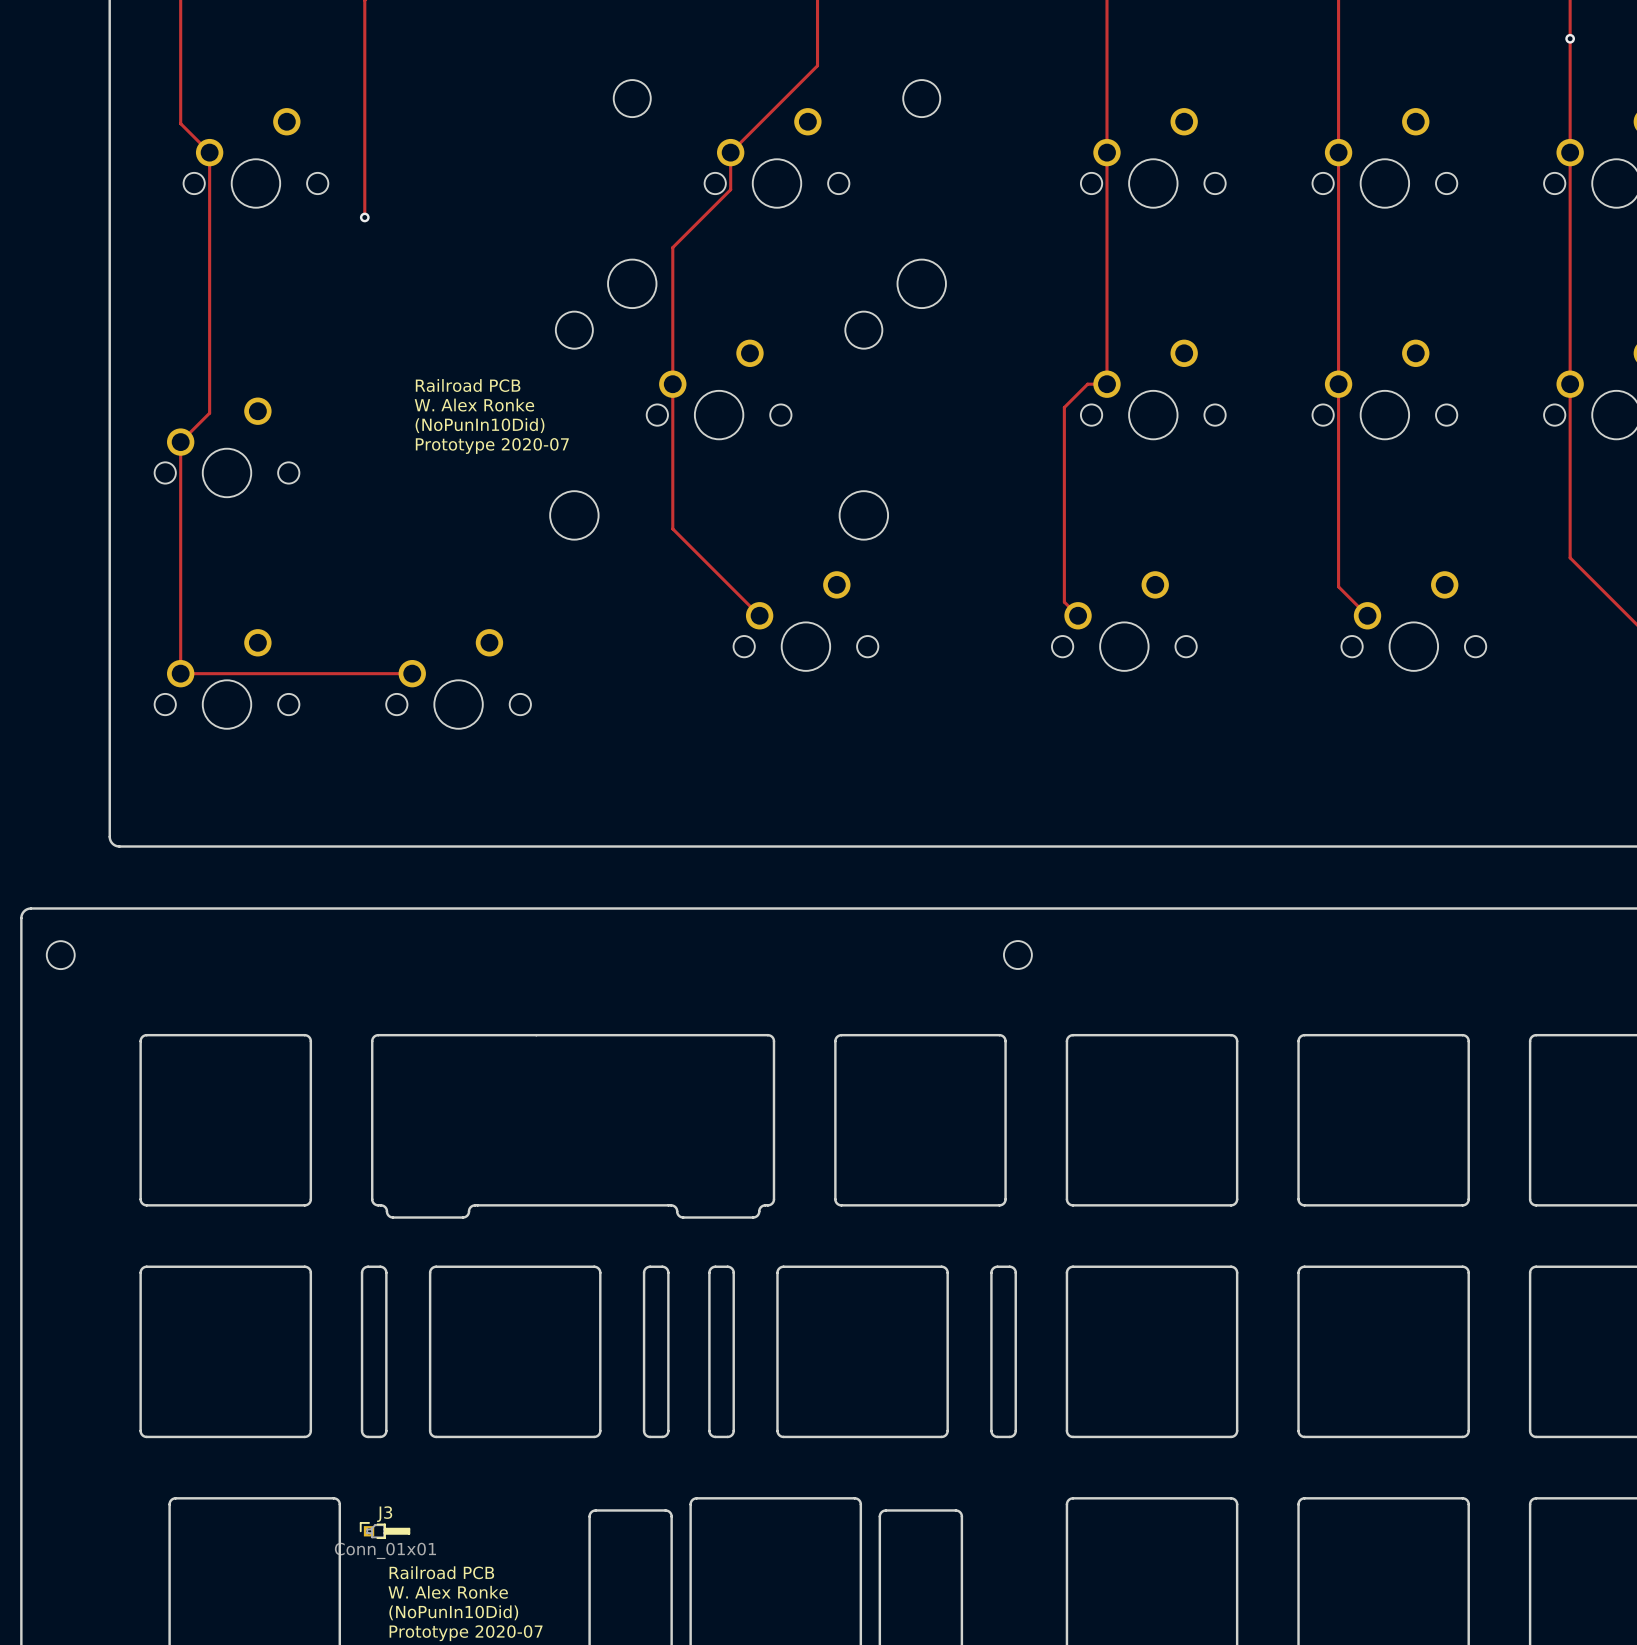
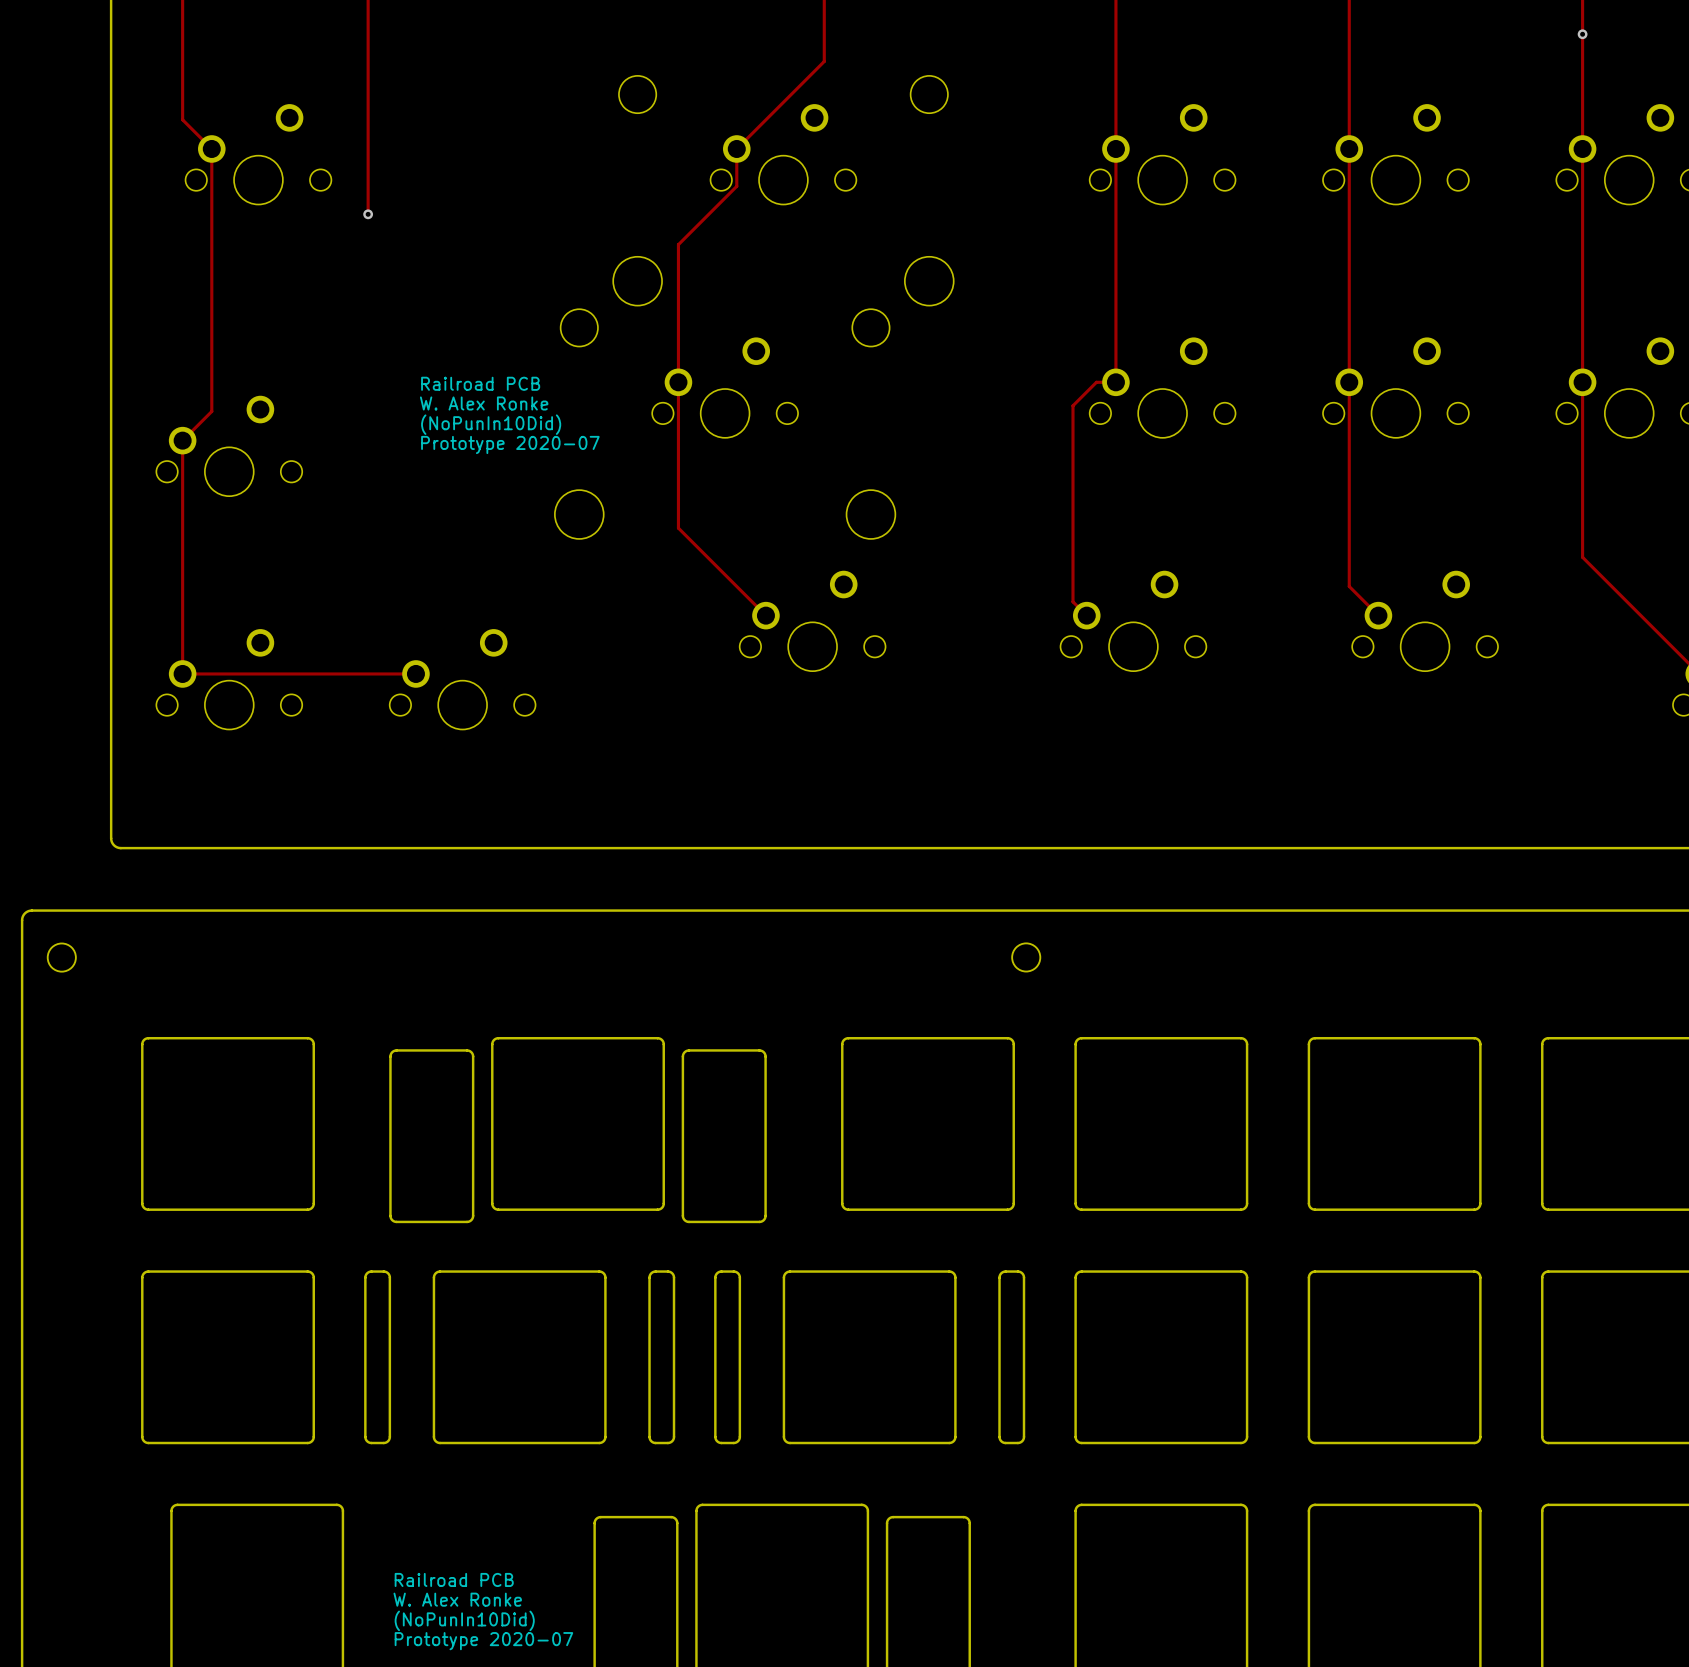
board edge: (494, 1035) (378, 1035) (373, 1038) (372, 1200) (375, 1204) (384, 1206) (386, 1211) -> (498, 1038) (494, 1040) (492, 1044) (492, 1203) (494, 1207) (498, 1209)
board edge: (652, 1035) (767, 1035) (773, 1038) (773, 1200) (770, 1204) (761, 1206) (759, 1211) -> (657, 1038) (661, 1040) (663, 1044) (663, 1203) (661, 1207) (657, 1209)
board edge: (494, 1205) (473, 1205) (469, 1211) -> (390, 1215) (390, 1056) (392, 1052) (396, 1050) (467, 1050) (472, 1054) (473, 1215)
board edge: (652, 1205) (672, 1205) (677, 1211) -> (765, 1215) (765, 1056) (763, 1052) (759, 1050) (689, 1050) (683, 1054) (682, 1215)
J3: Conn_01x01 (384, 1530) -> none

